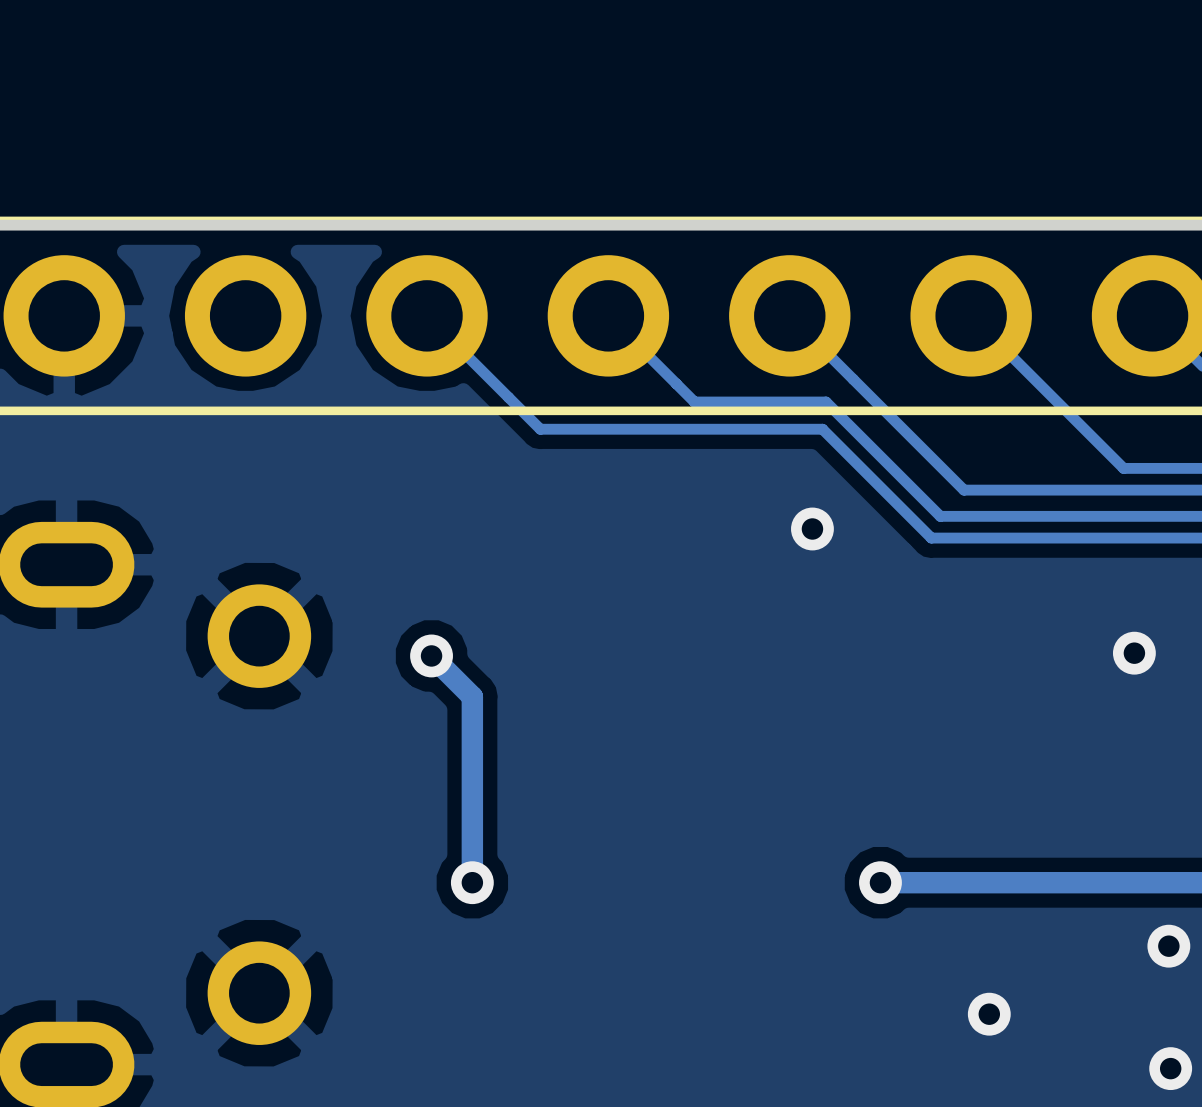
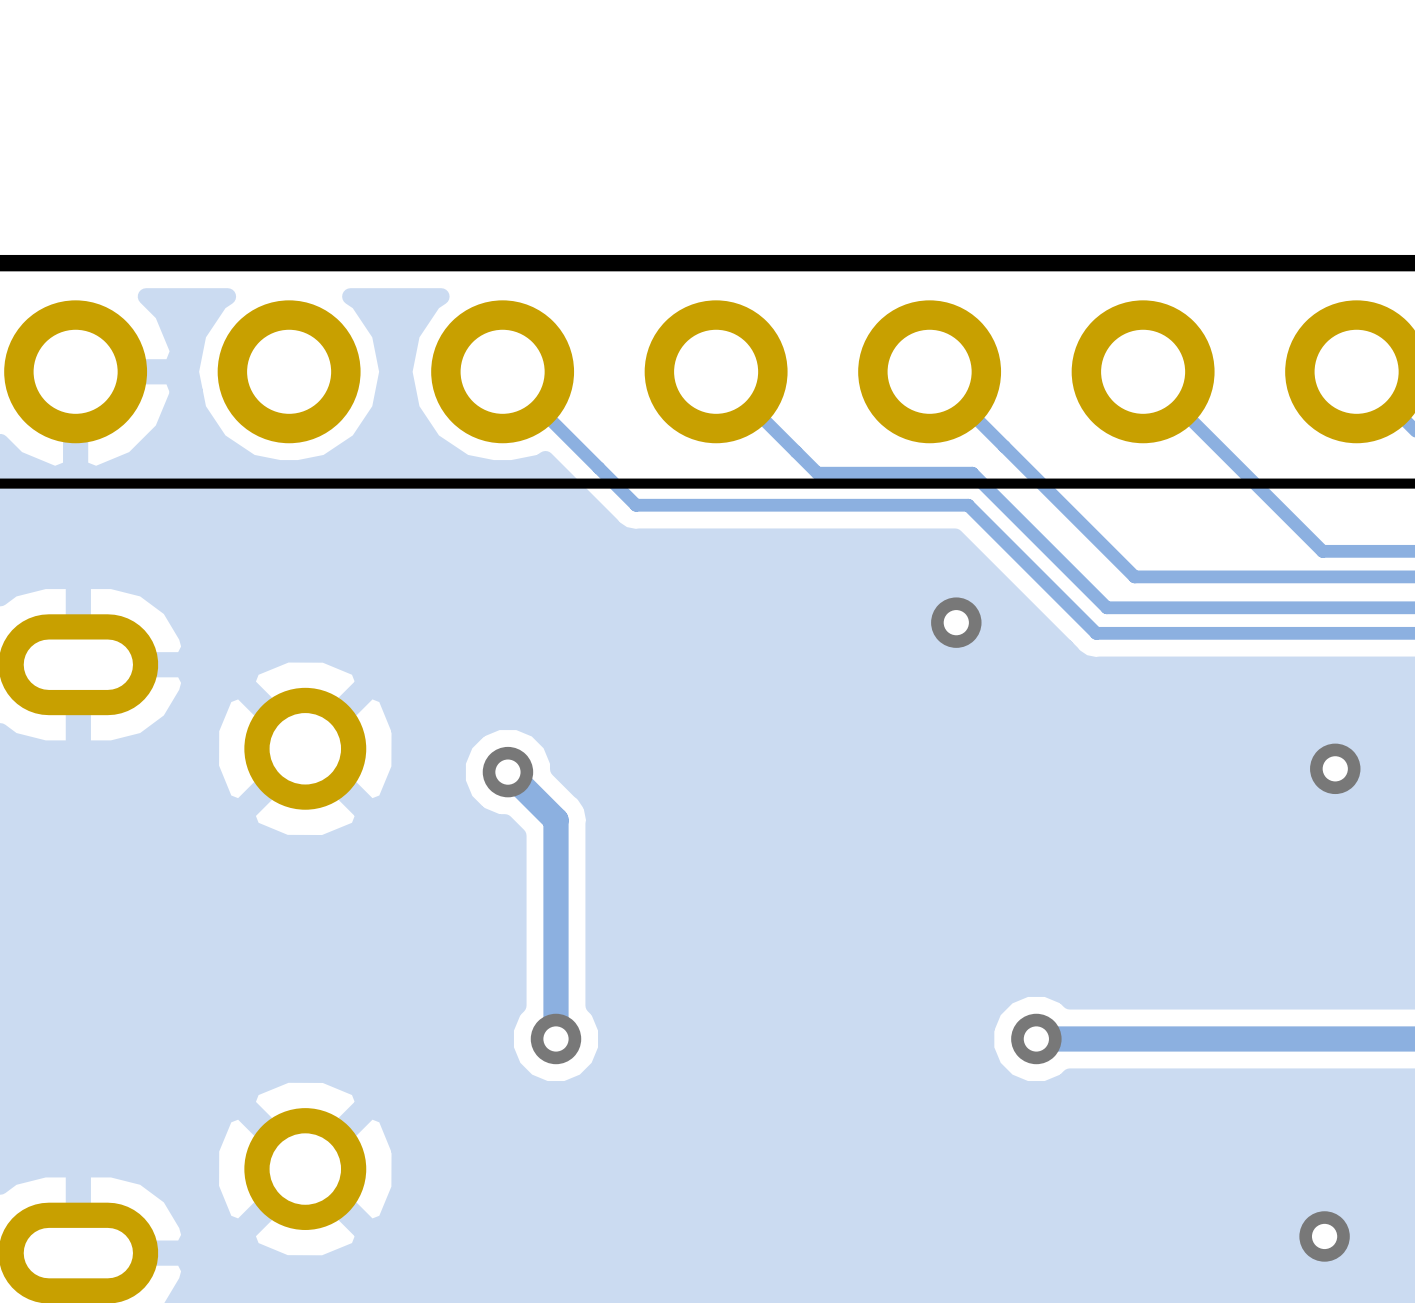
via: (1168, 946) -> none
via: (989, 1014) -> none
via position: (1170, 1068) -> (1324, 1236)

